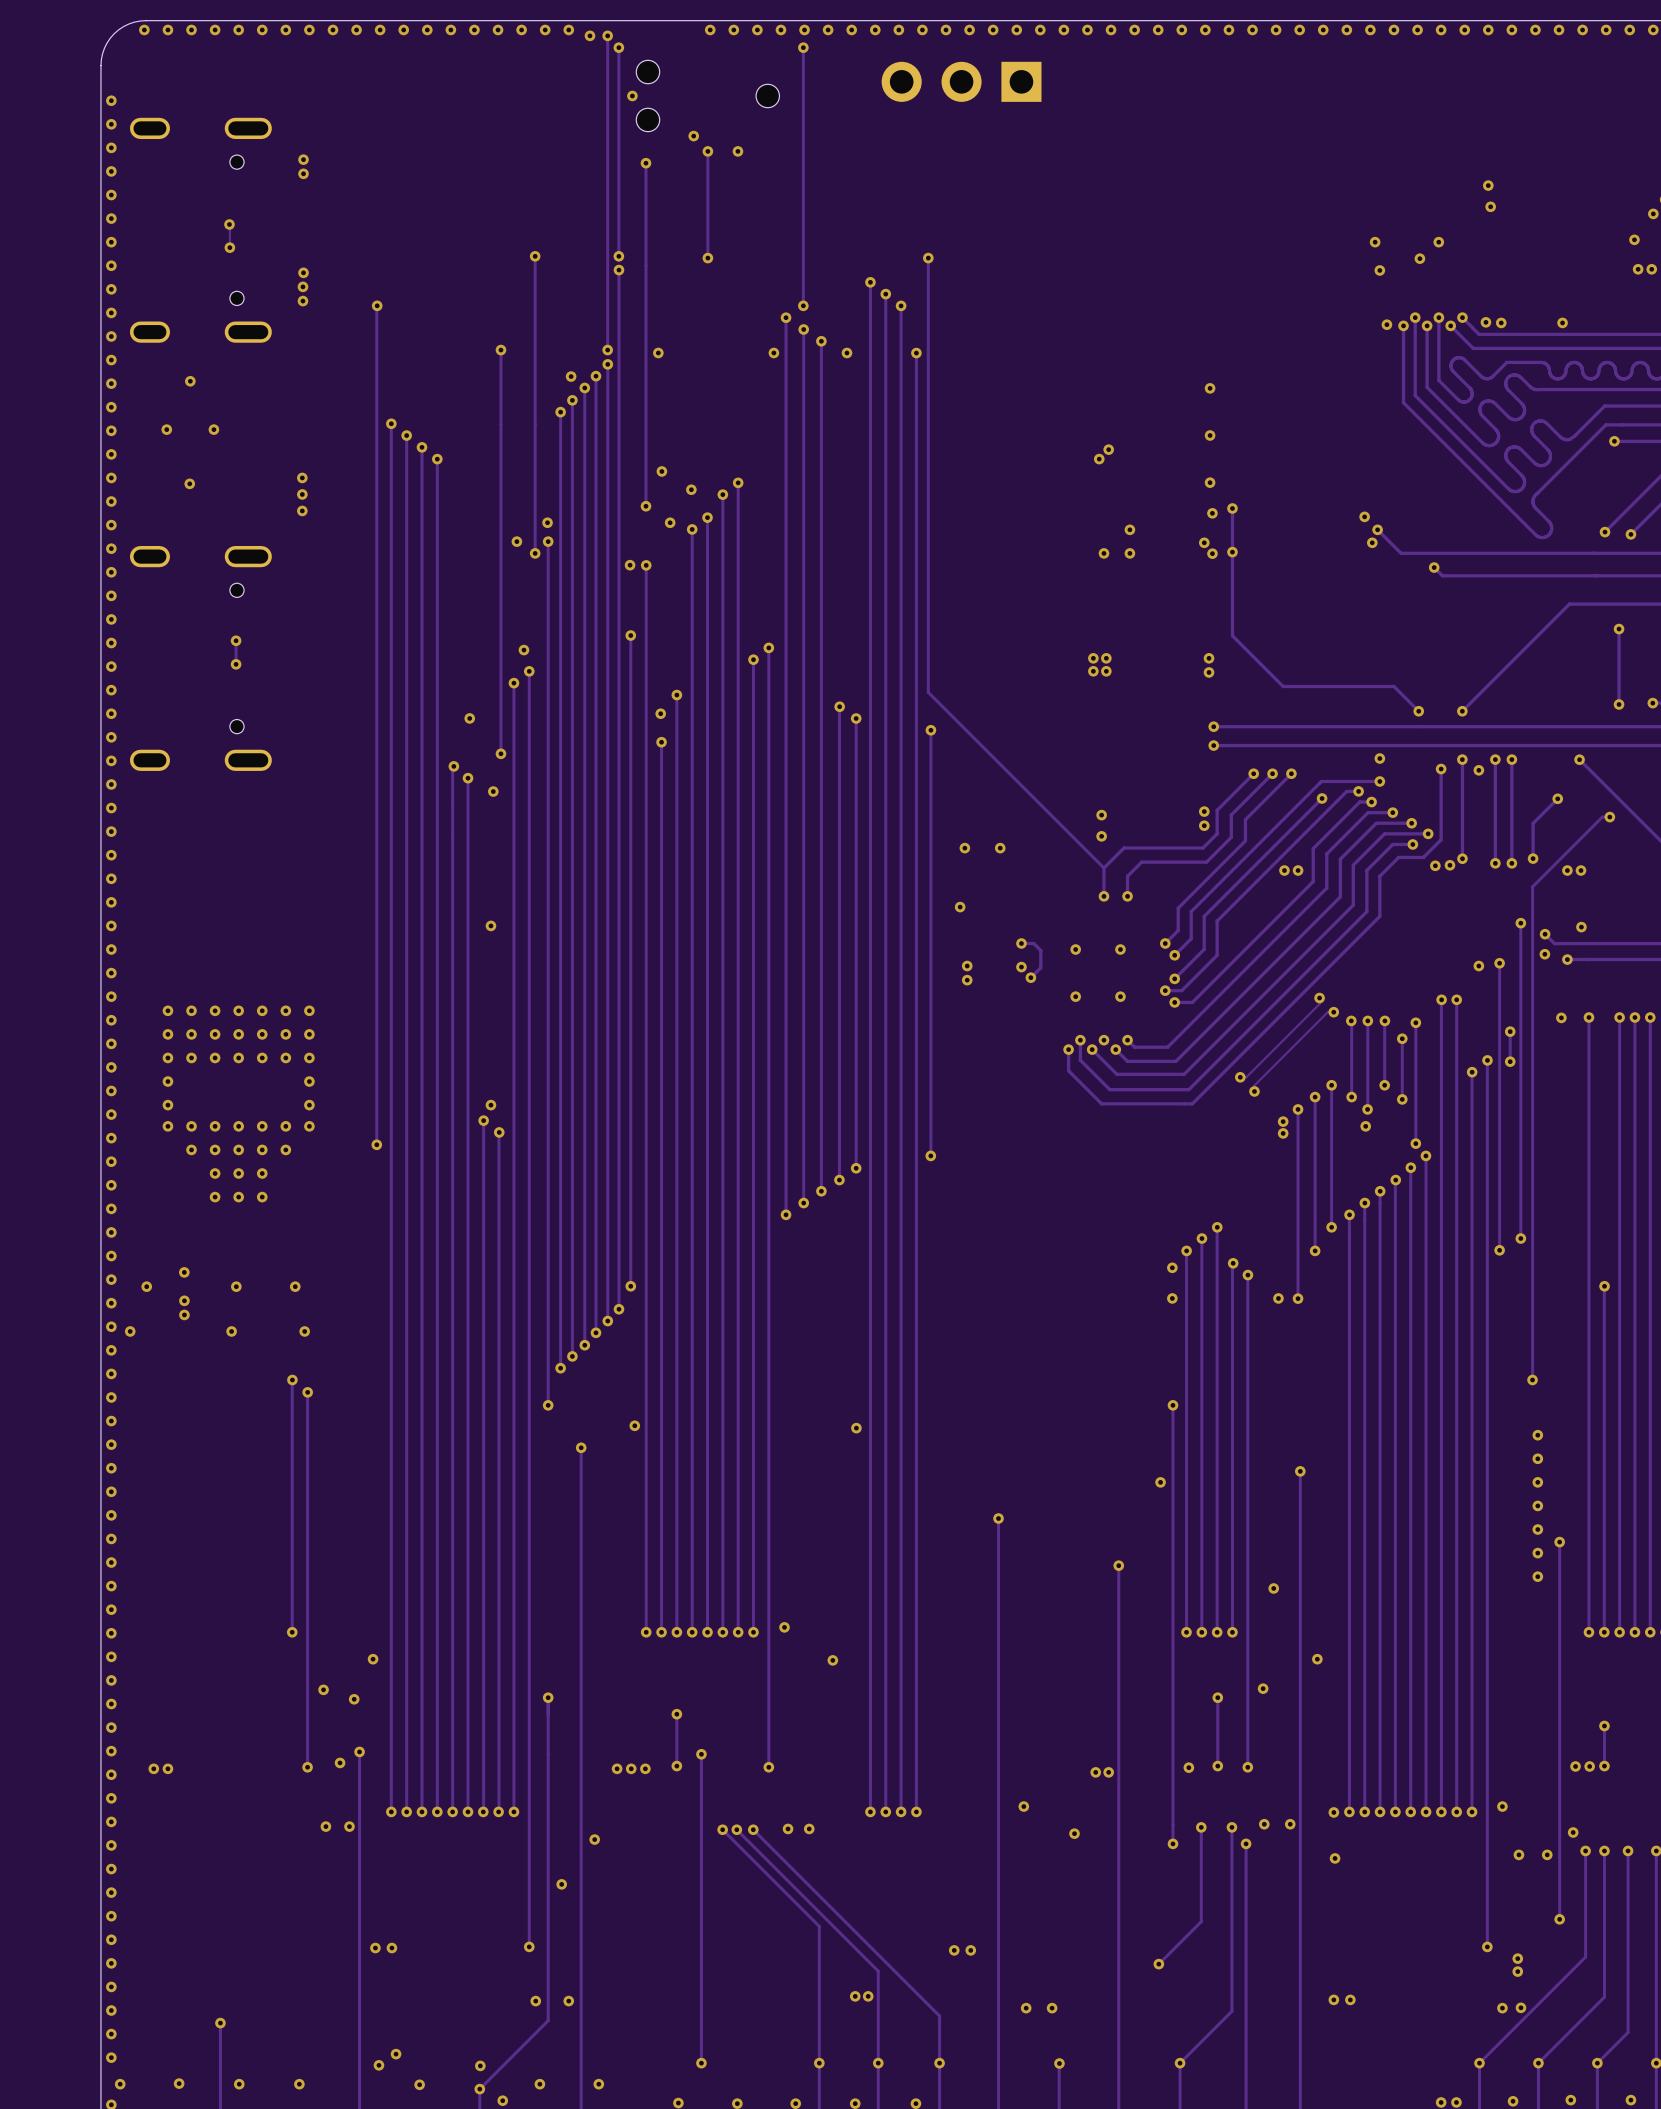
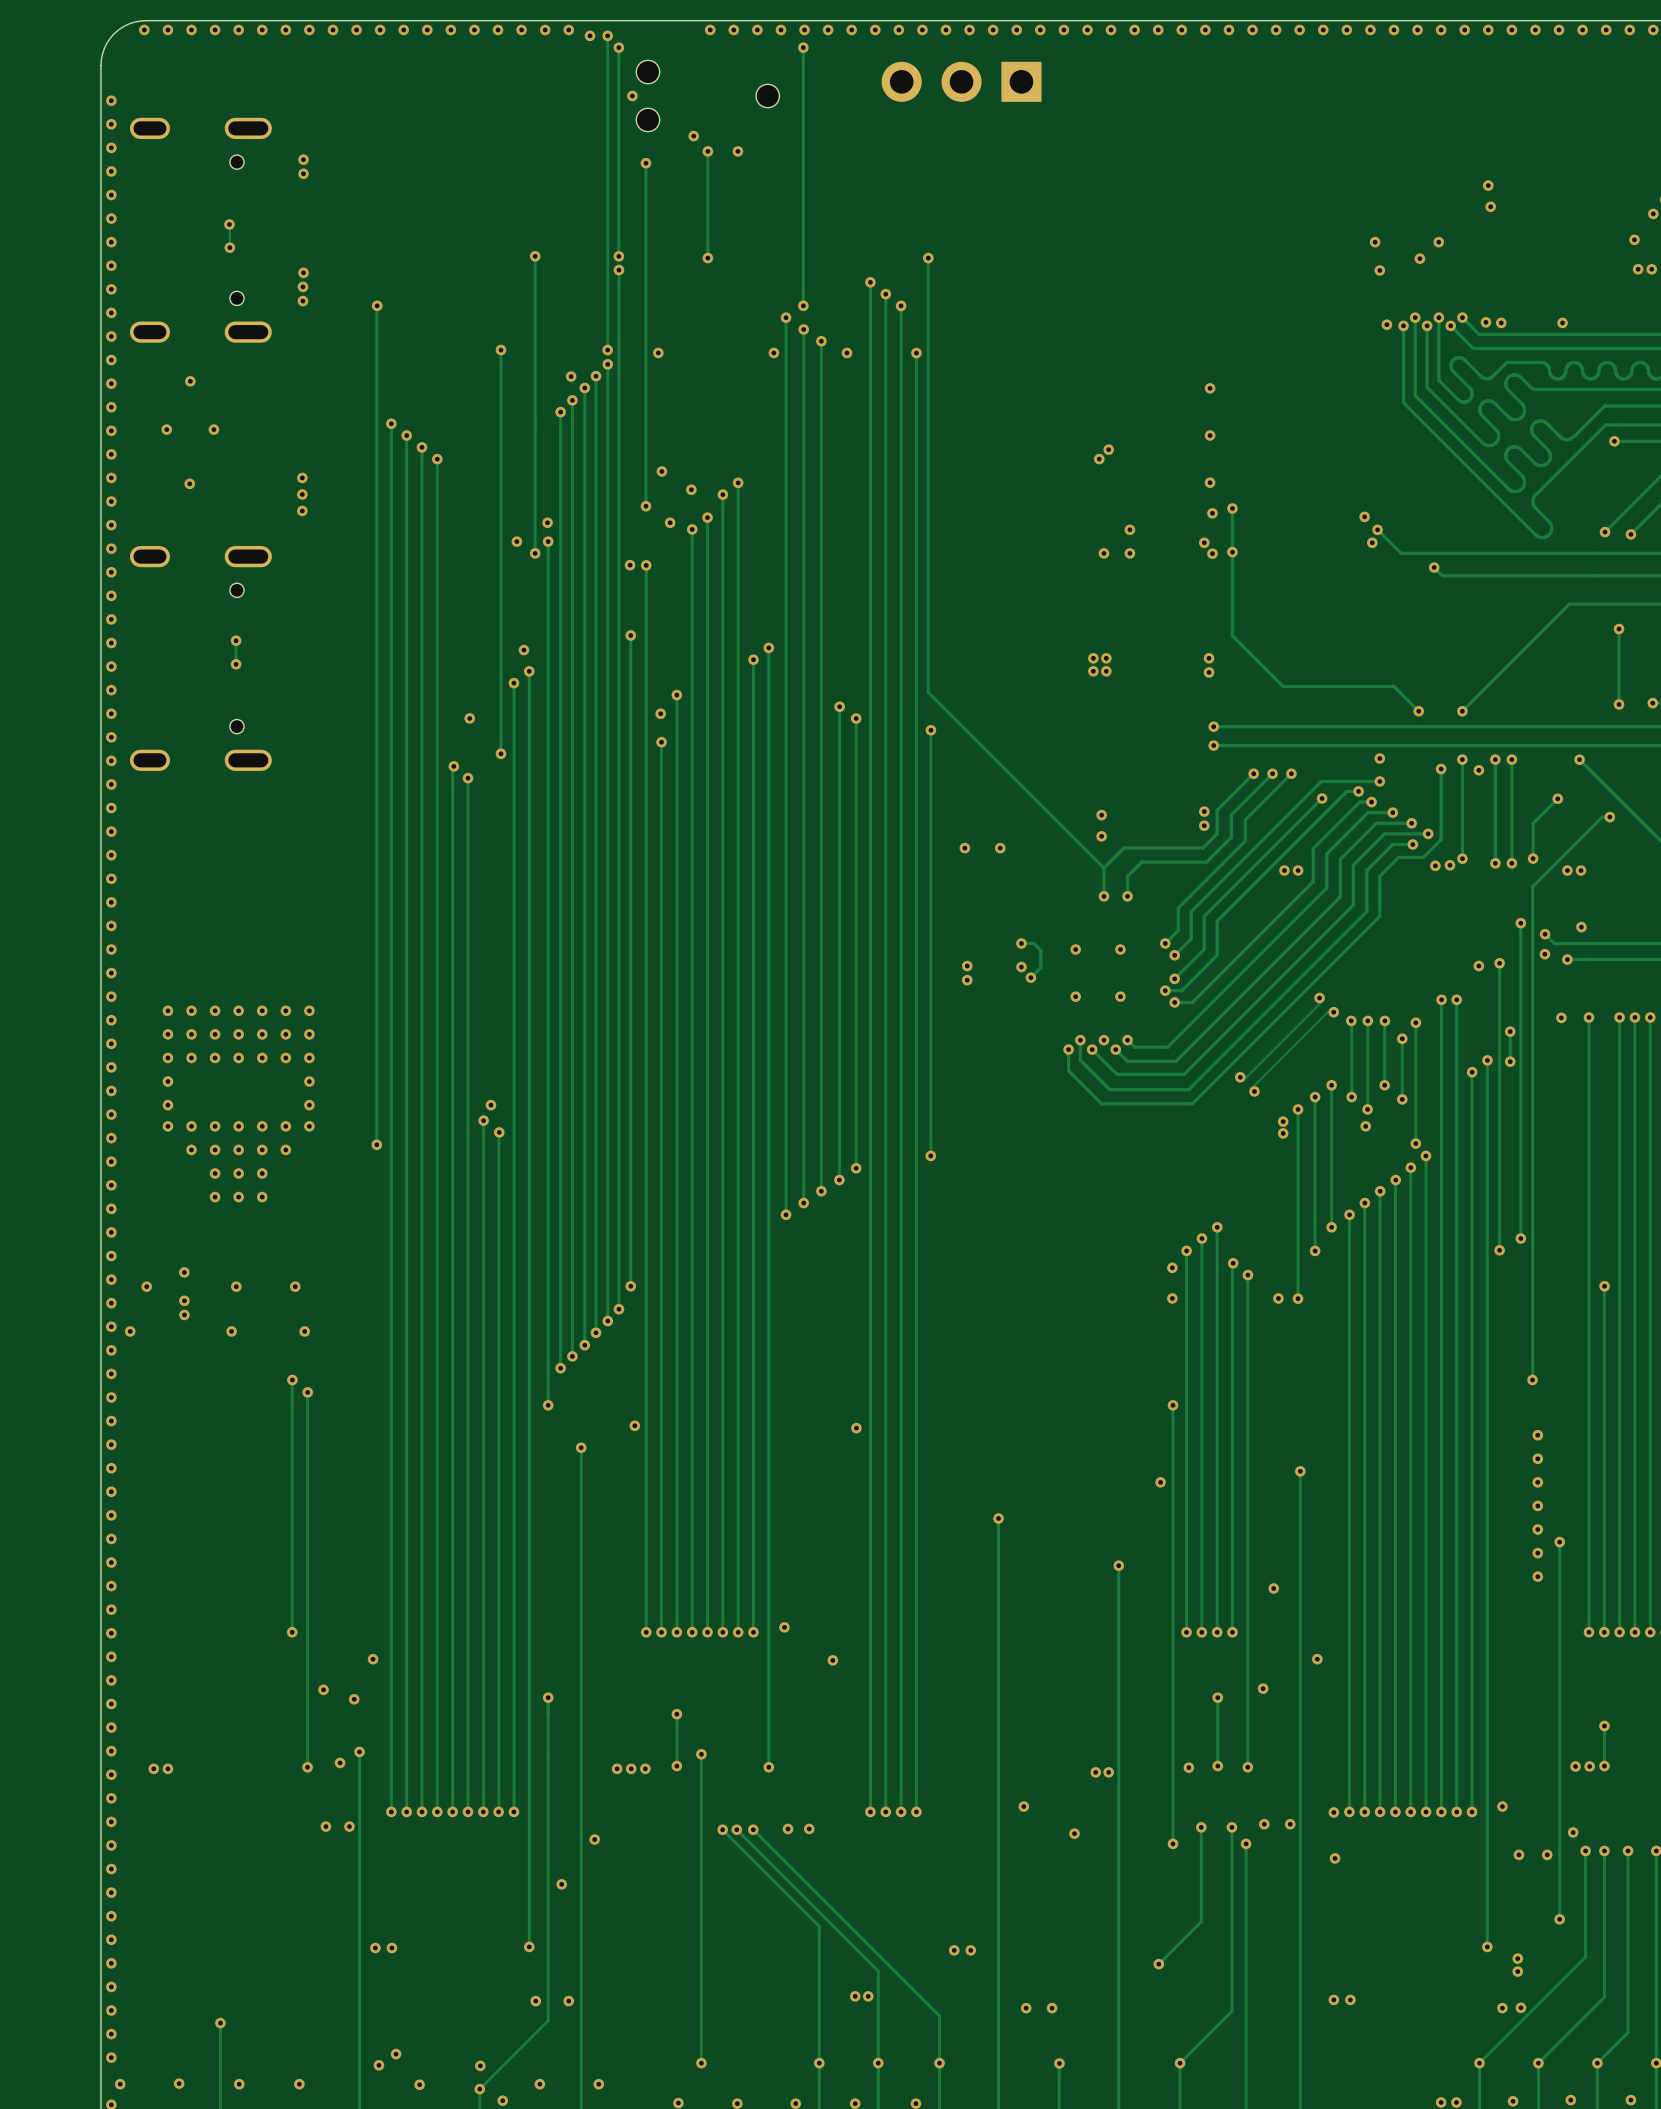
via: (493, 791) -> none
via: (960, 907) -> none
via: (490, 925) -> none

